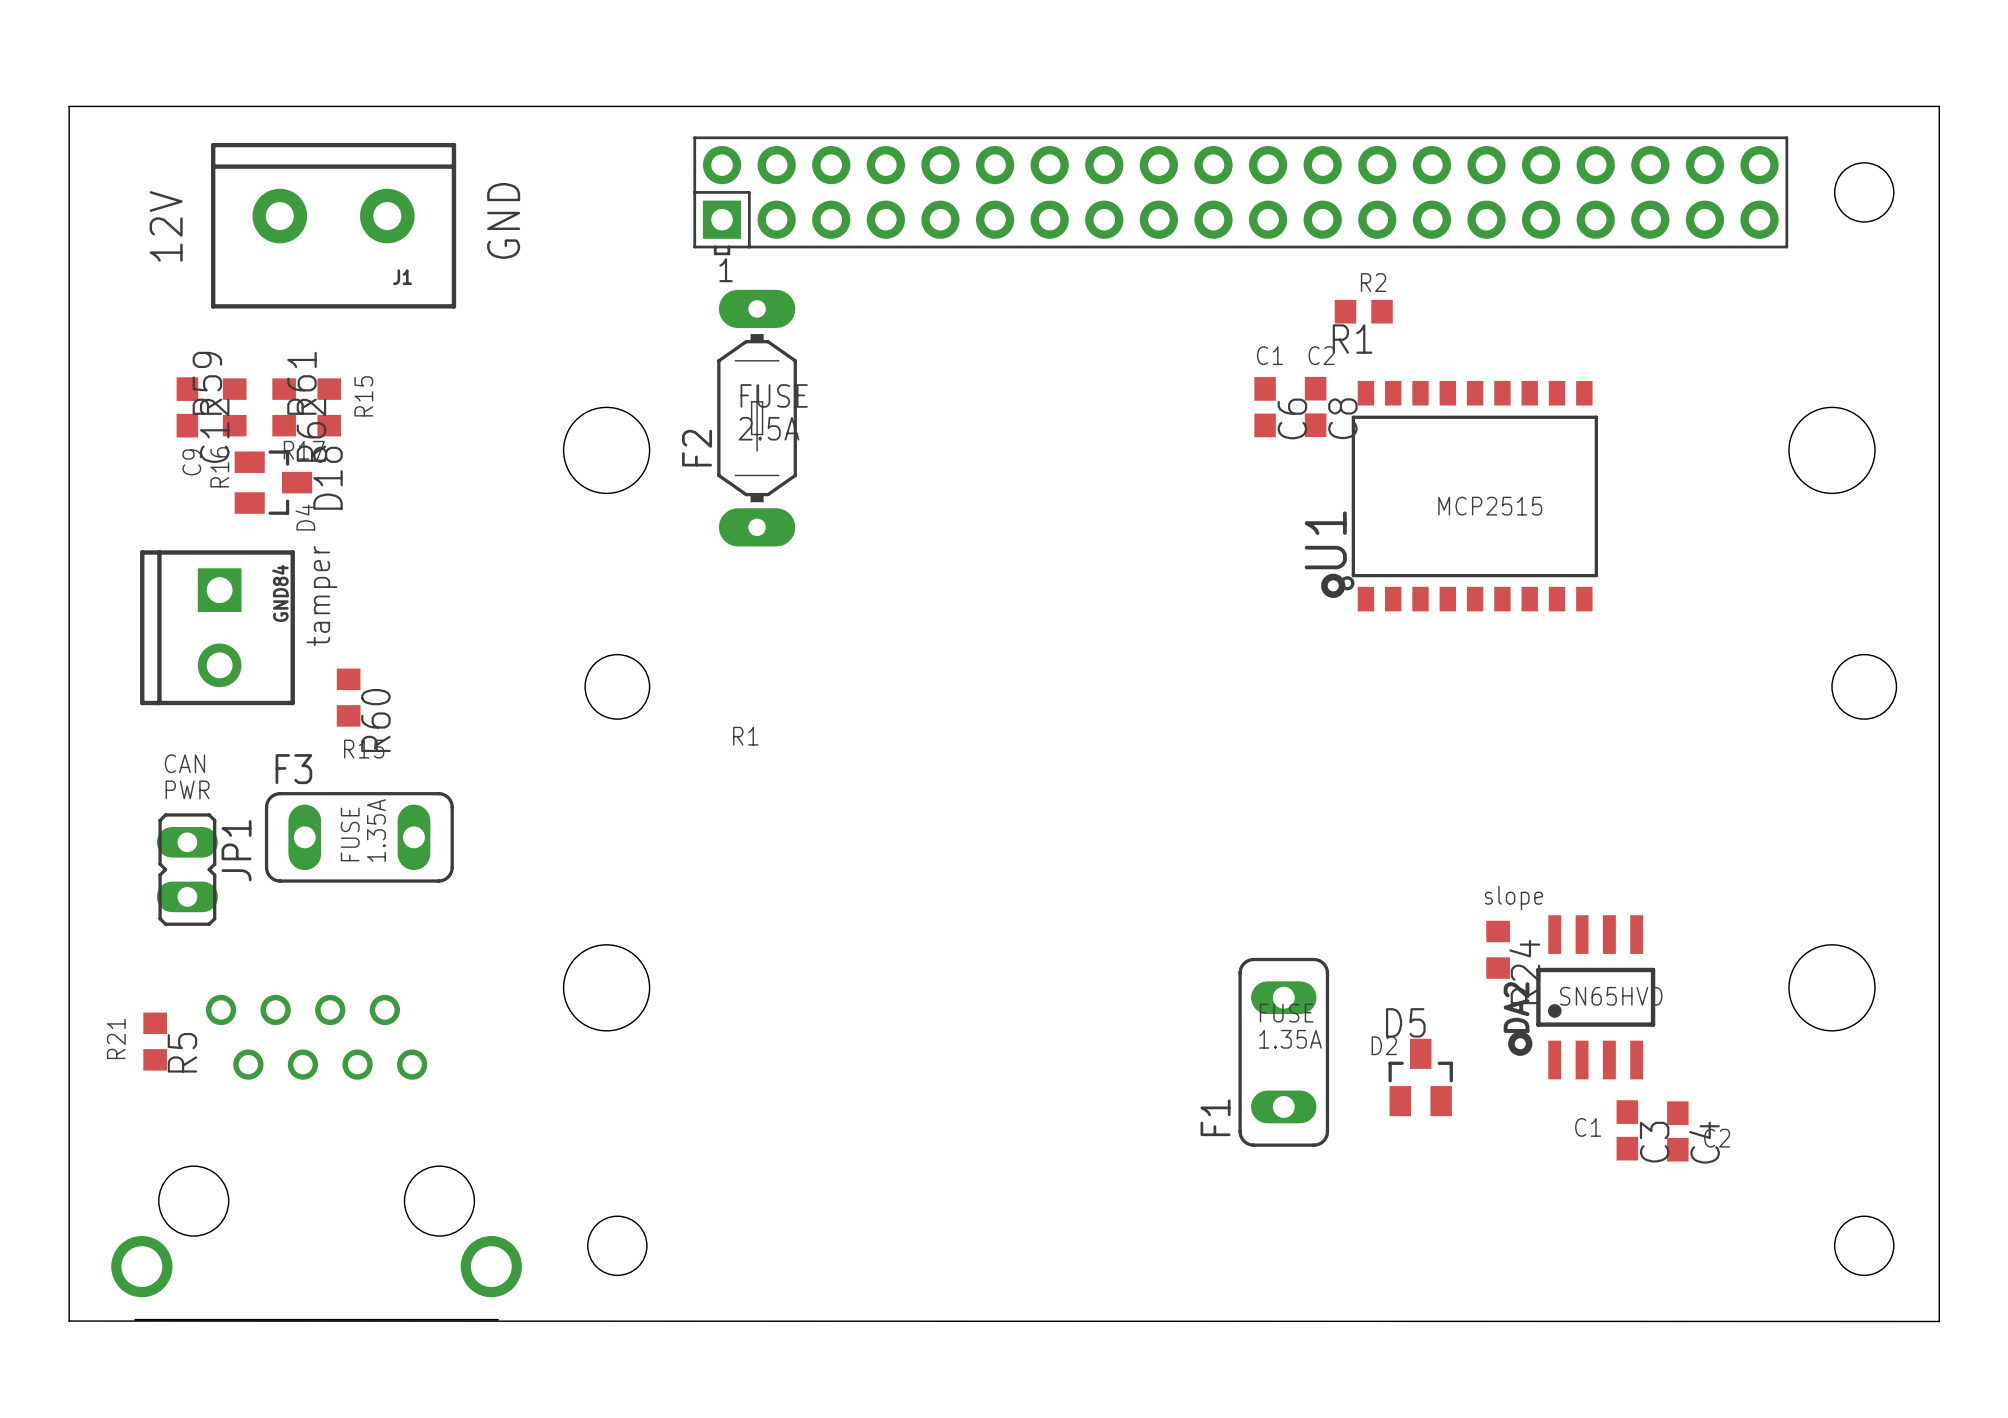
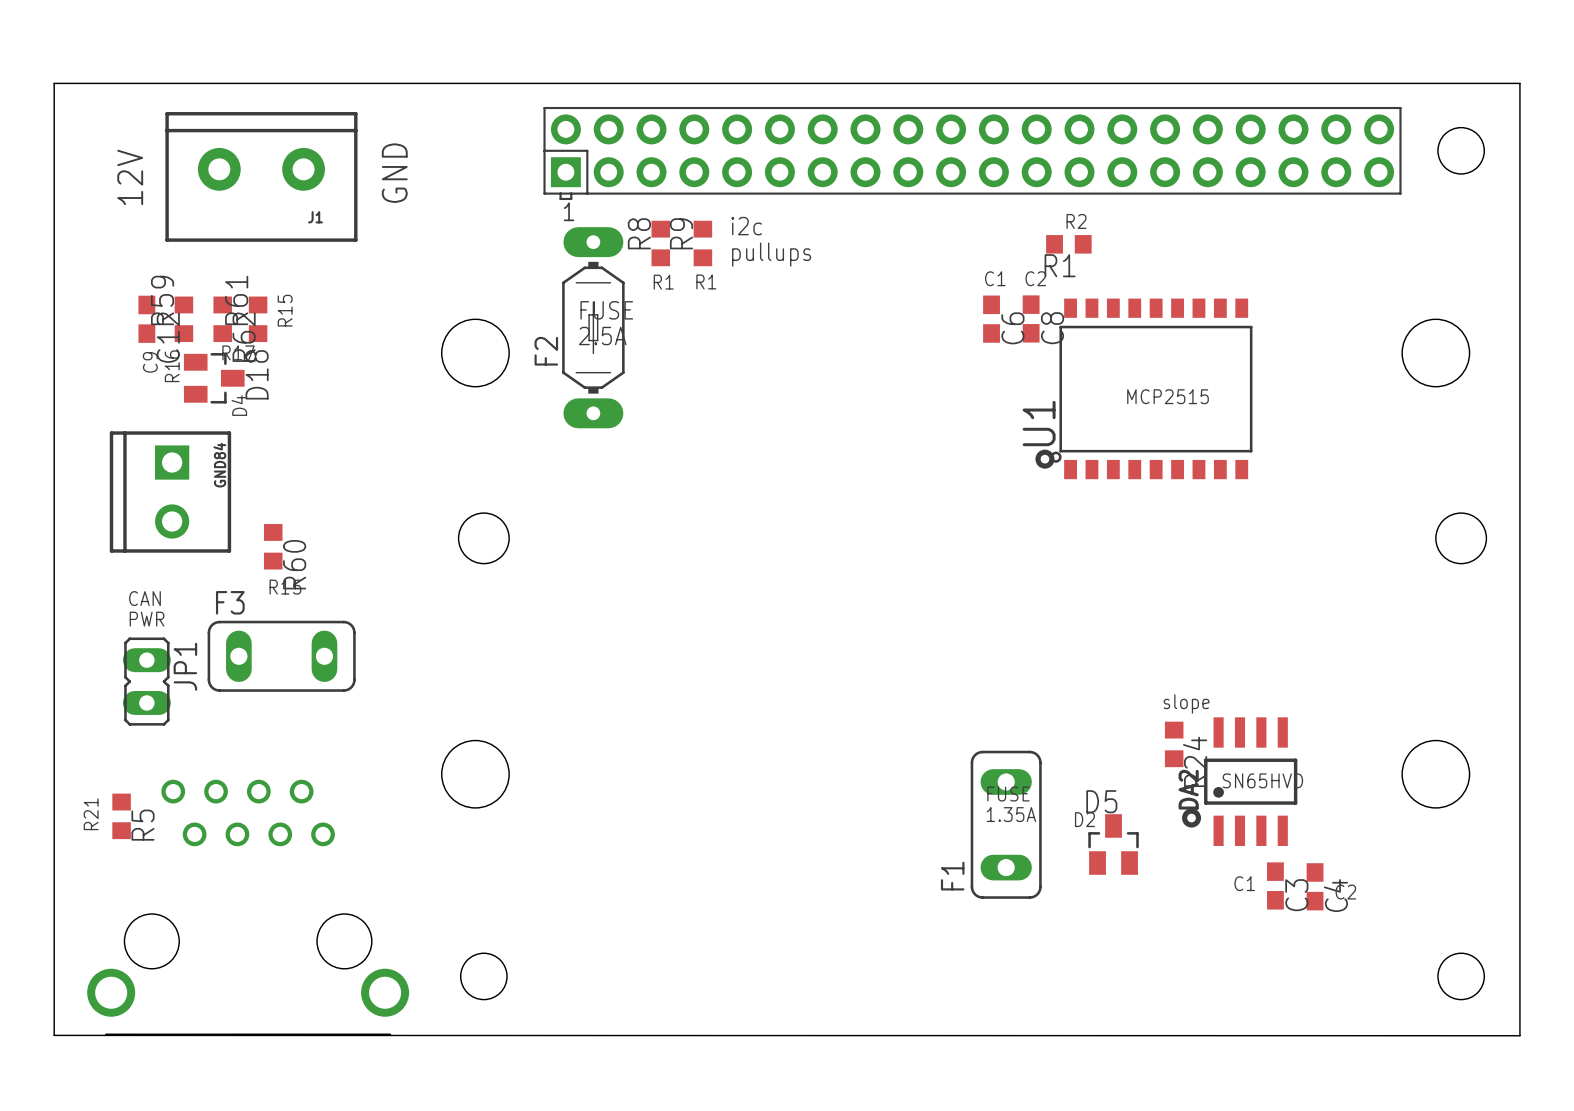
text: none -> i2c (746, 226)
R8: none -> (660, 243)
R9: none -> (702, 243)
text: none -> pullups (771, 254)
text: none -> R1 (663, 282)
text: none -> R1 (706, 281)
text: tamper (321, 596) -> none
text: R1 (745, 736) -> none
text: 1.35A (376, 830) -> none
text: FUSE (350, 834) -> none

